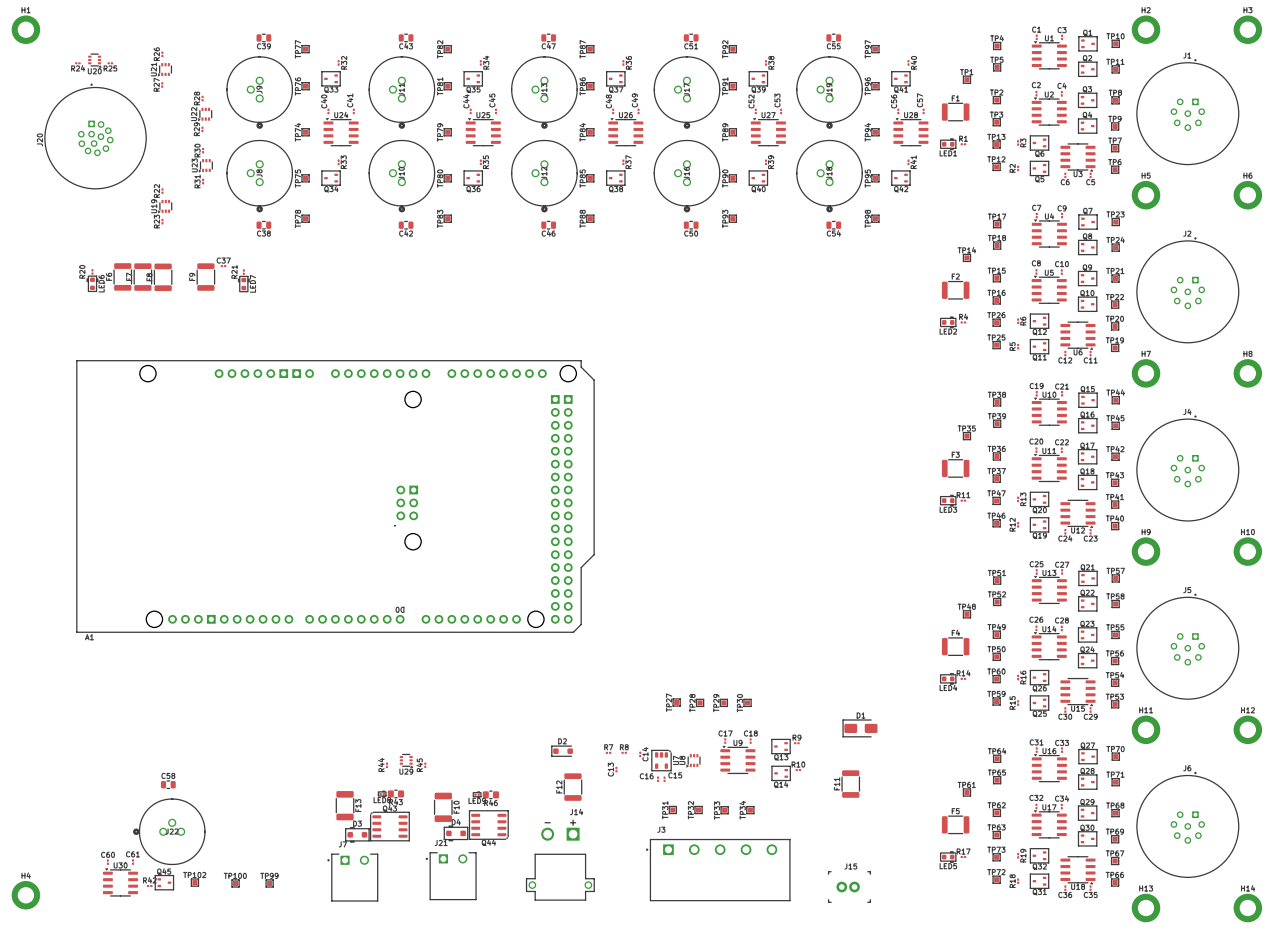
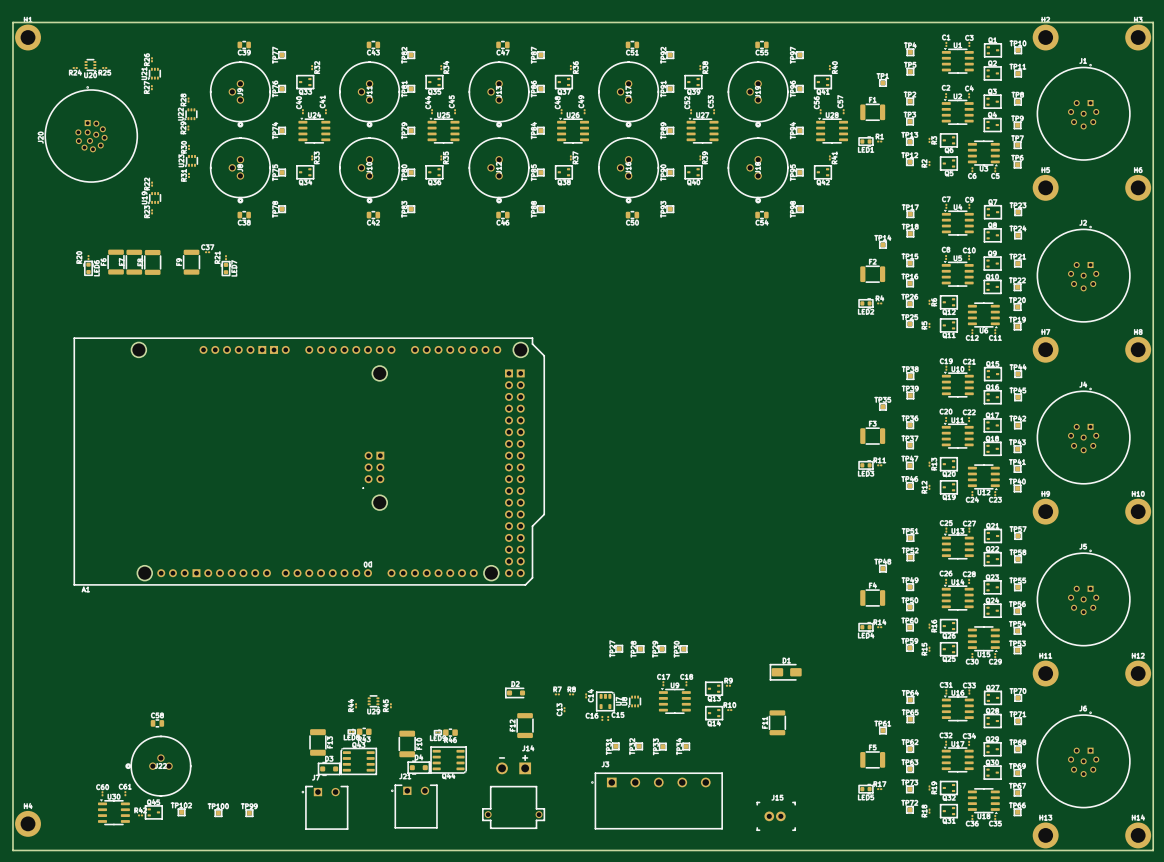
board edge: none -> (12, 22) (1153, 22) (1153, 850) (12, 850) (12, 22)

